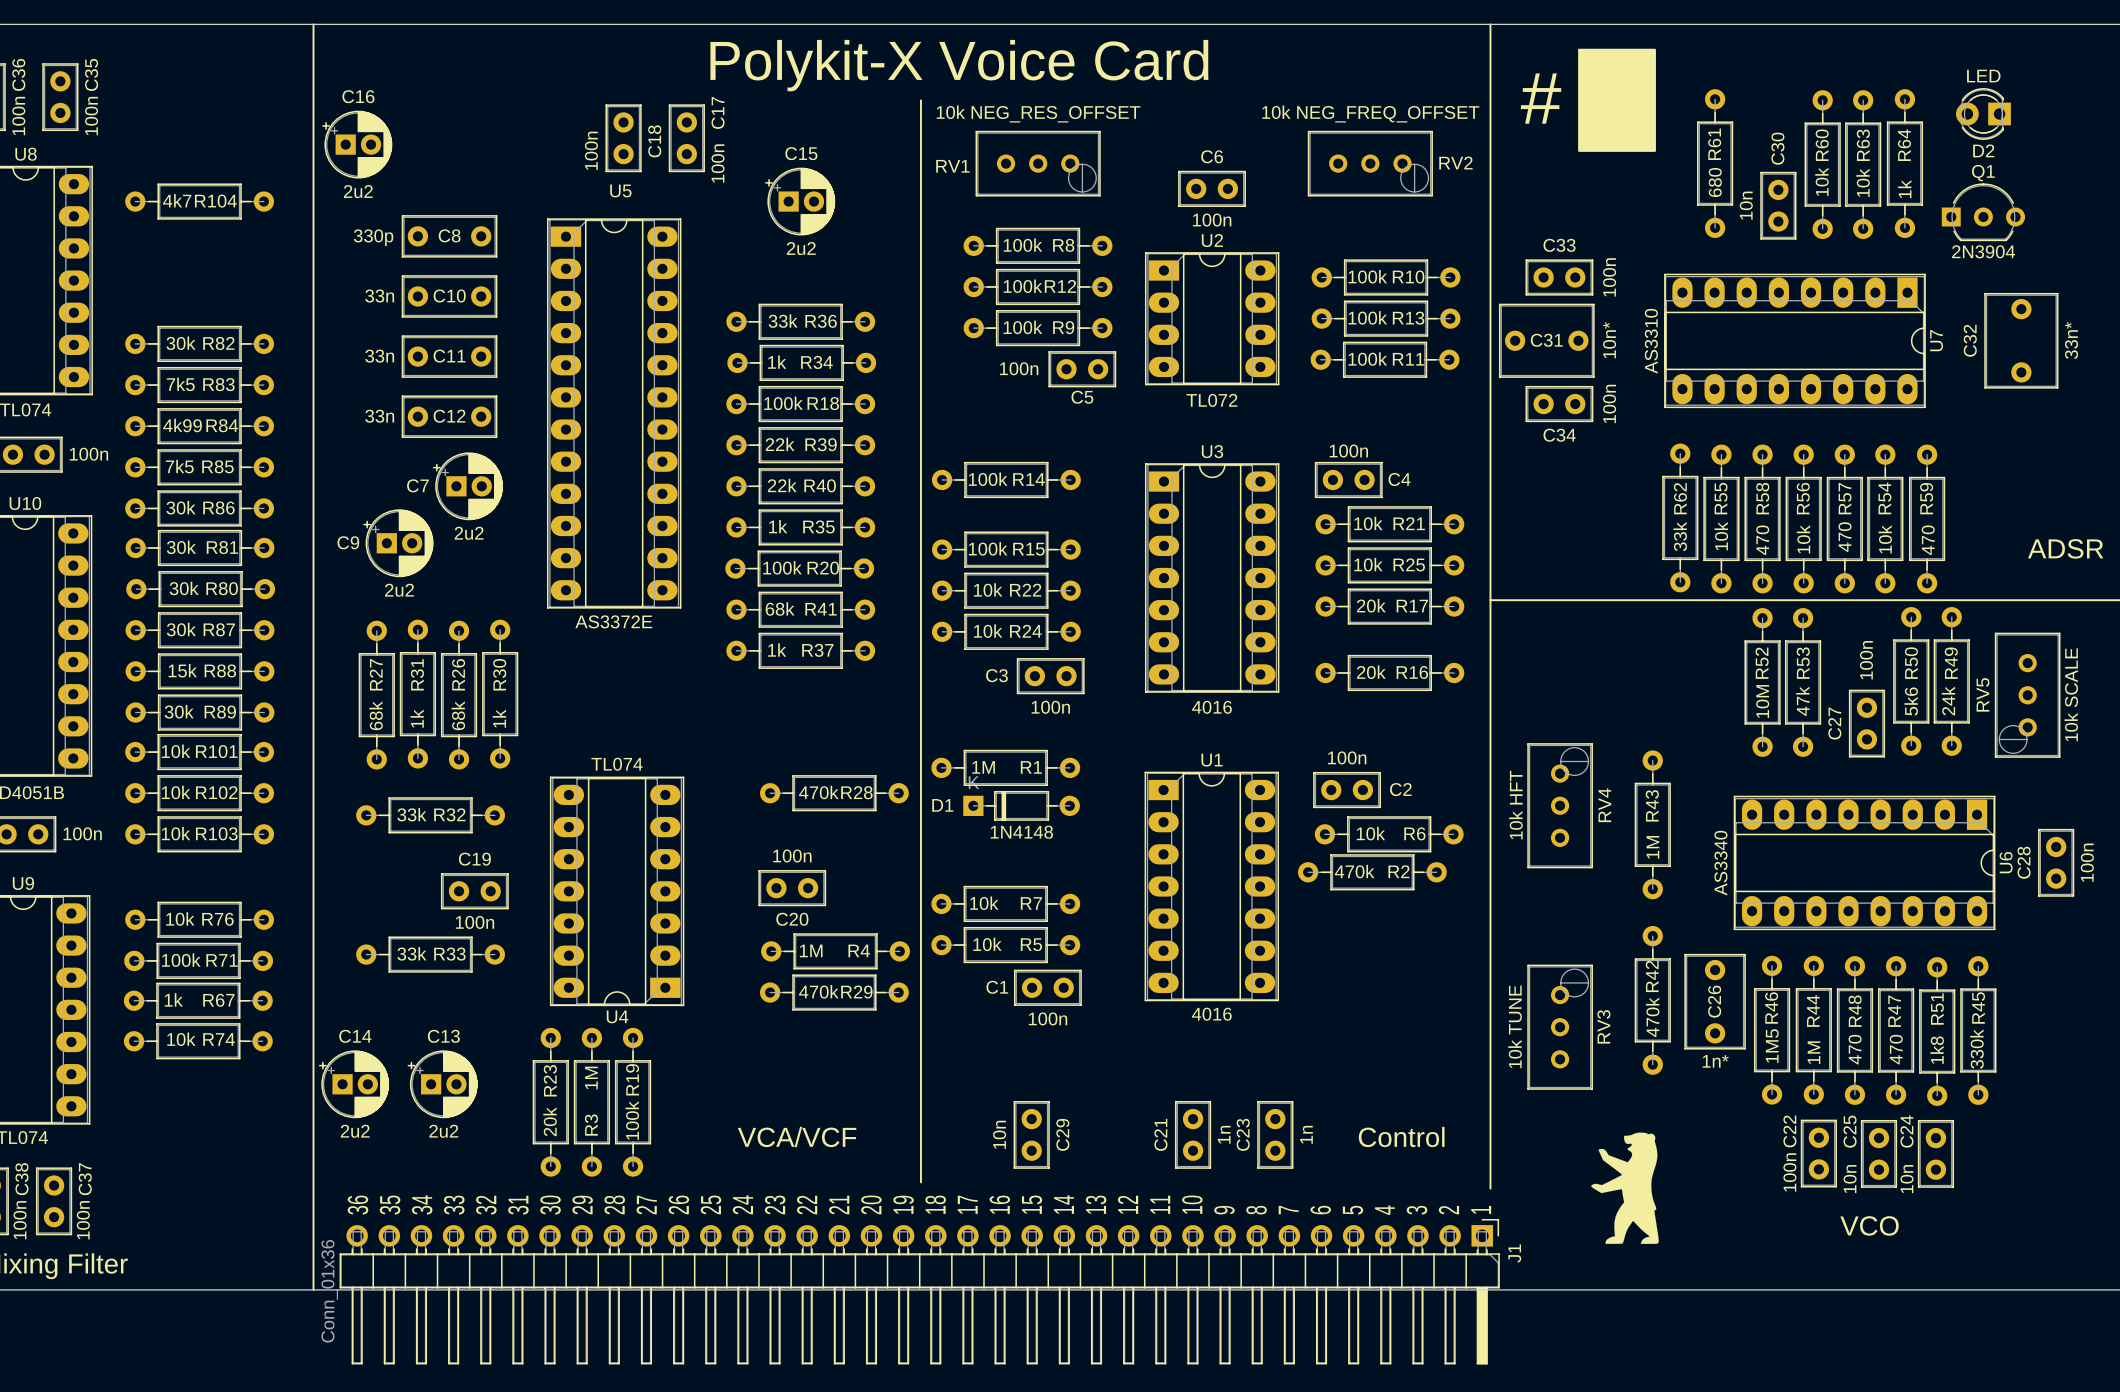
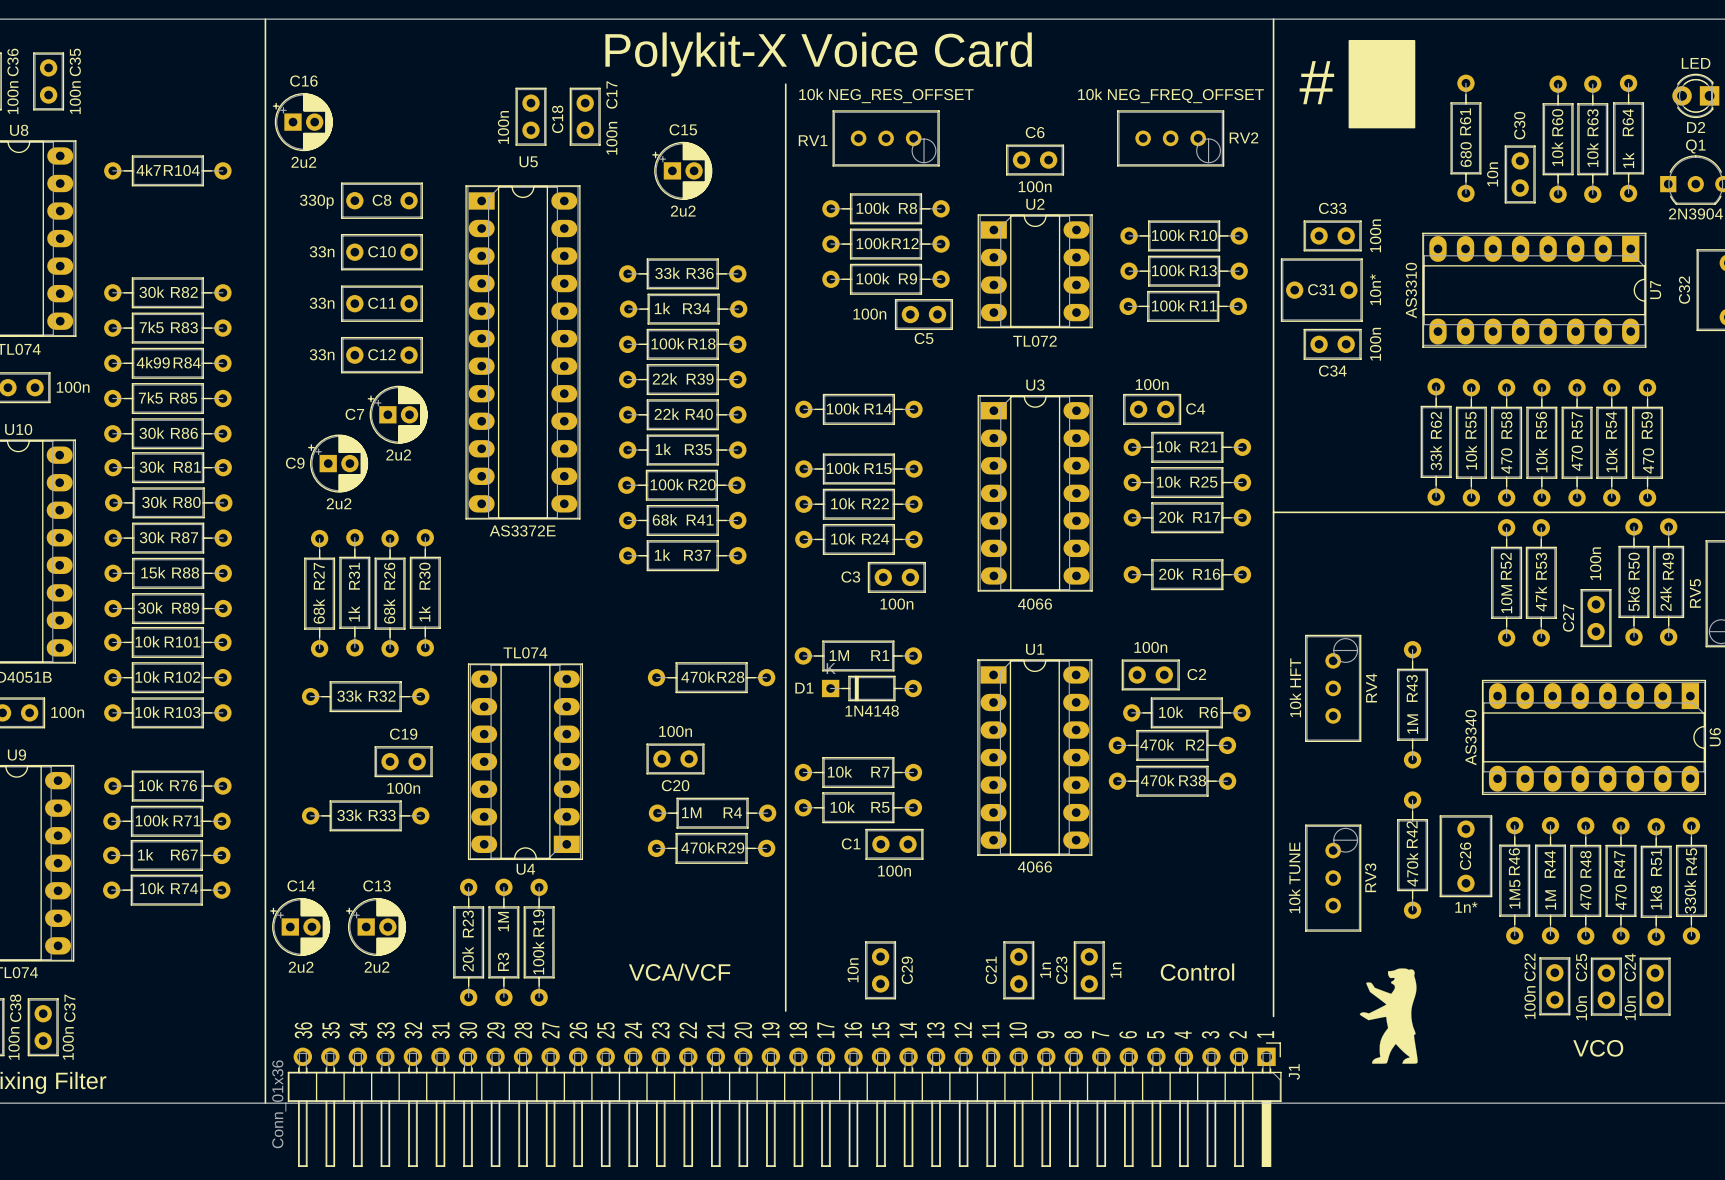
U3 value: 4016 (1211, 707) -> 4066 (1035, 604)
R38: none -> 470k (1172, 781)
U1 value: 4016 (1211, 1014) -> 4066 (1034, 866)

